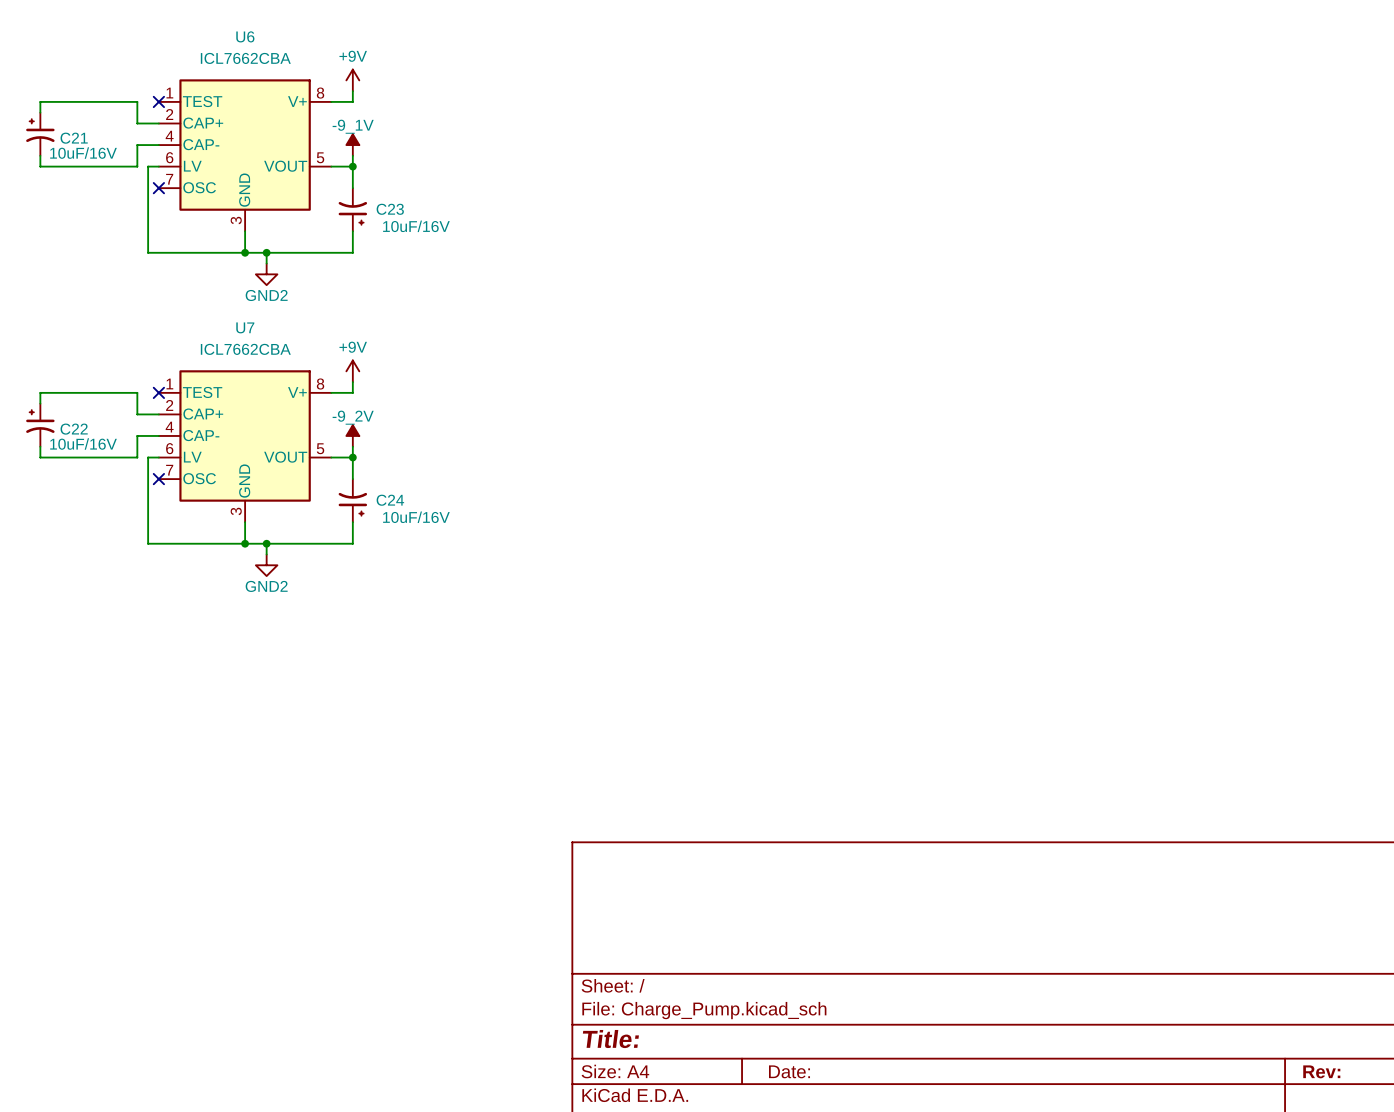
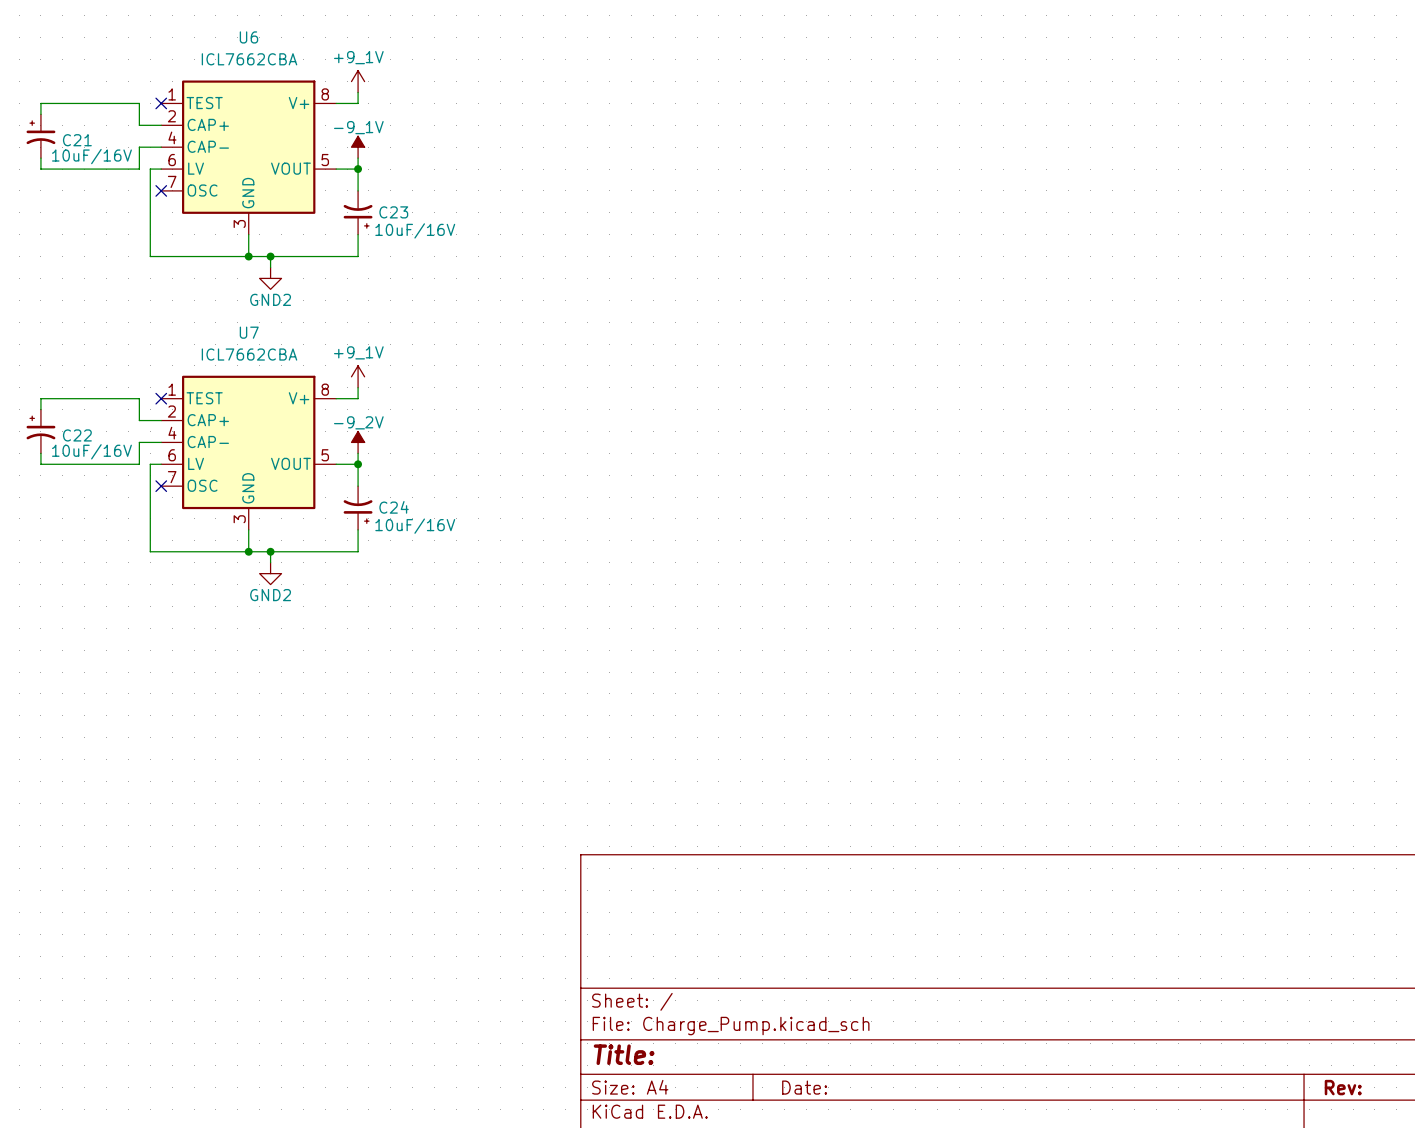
power symbol: +9V (352, 80) -> +9_1V (358, 81)
power symbol: +9V (352, 371) -> +9_1V (358, 376)

